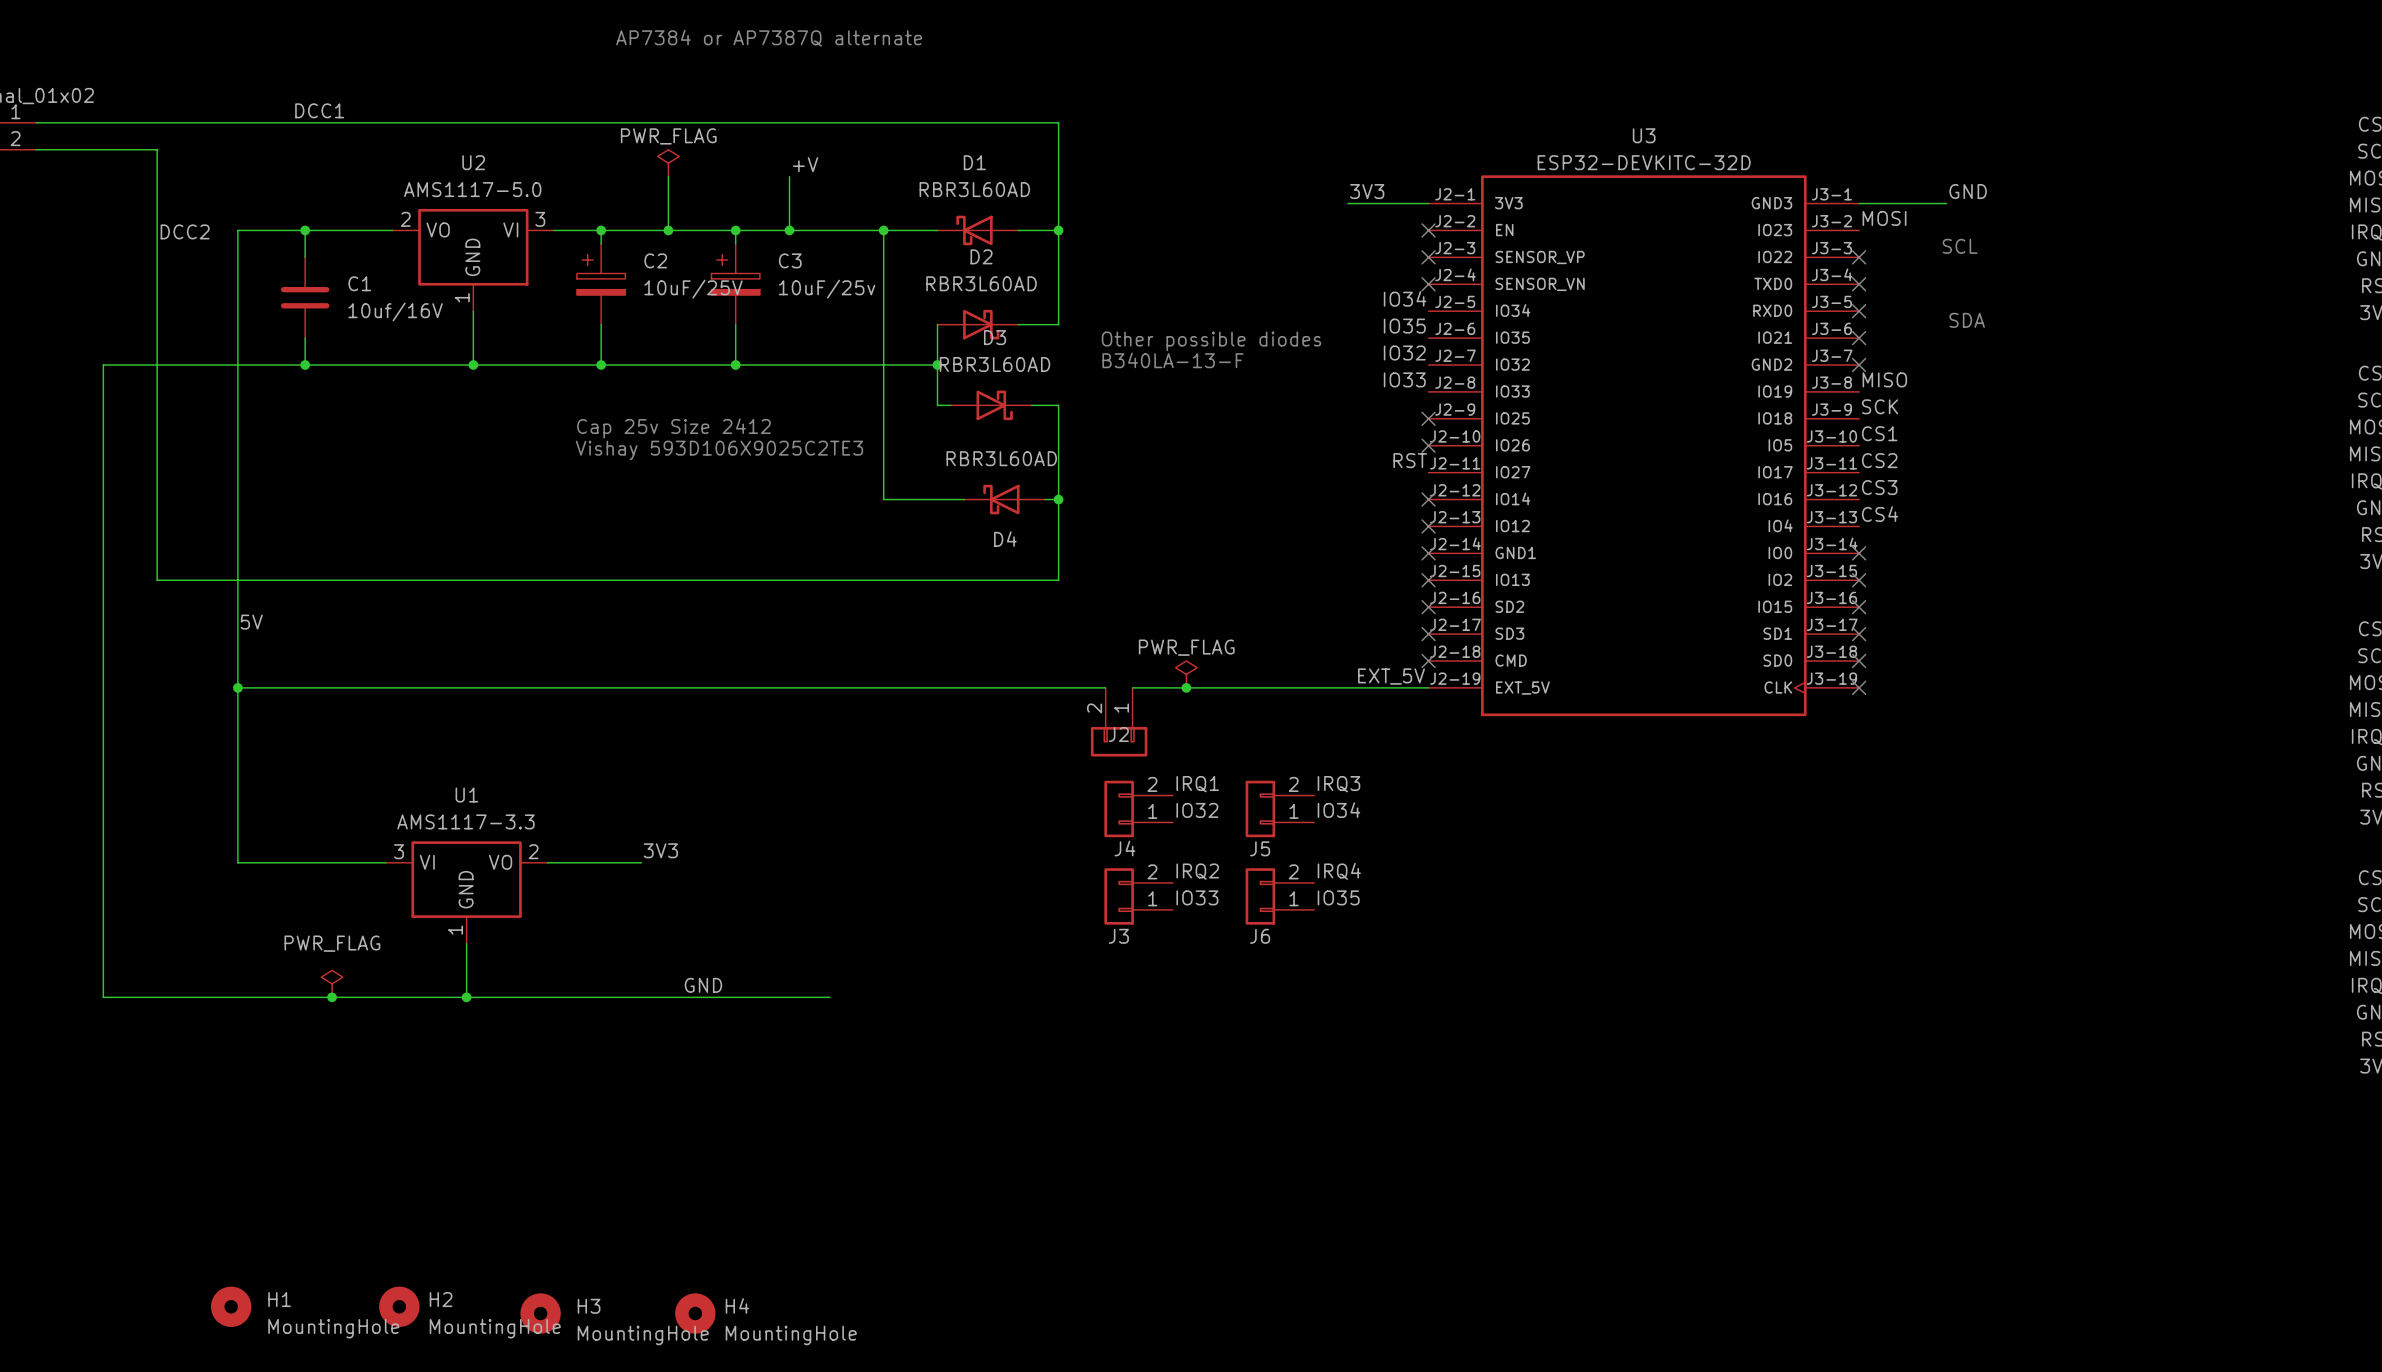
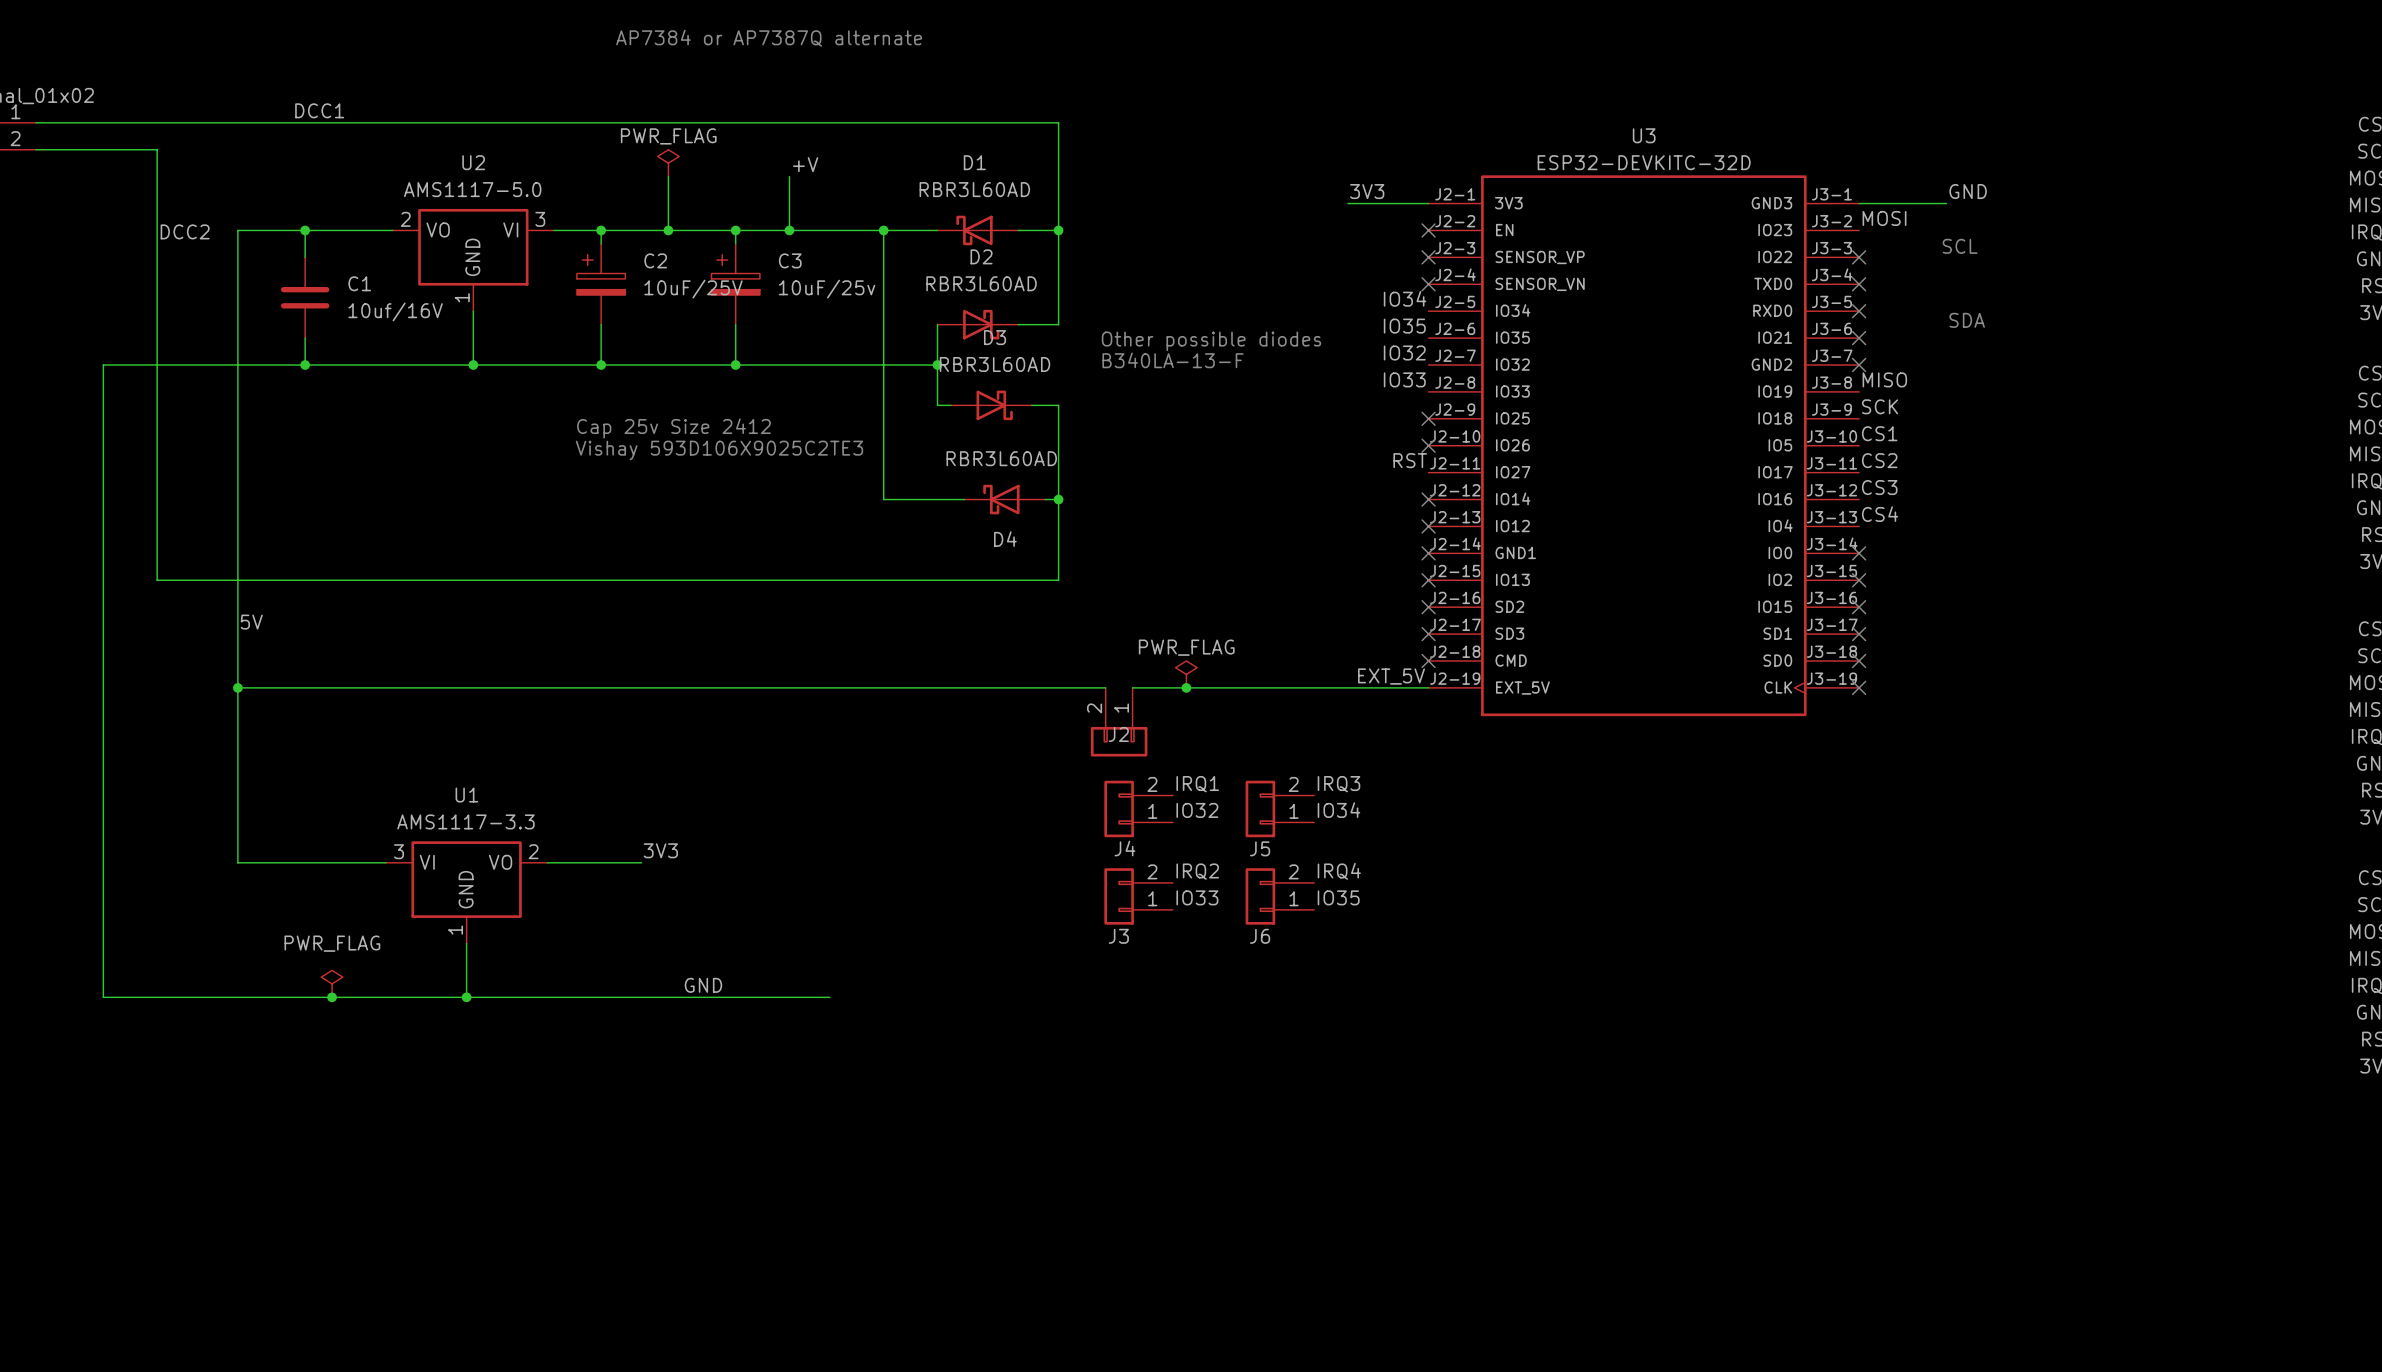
H1: MountingHole (231, 1306) -> none
H2: MountingHole (399, 1306) -> none
H3: MountingHole (540, 1313) -> none
H4: MountingHole (695, 1313) -> none

